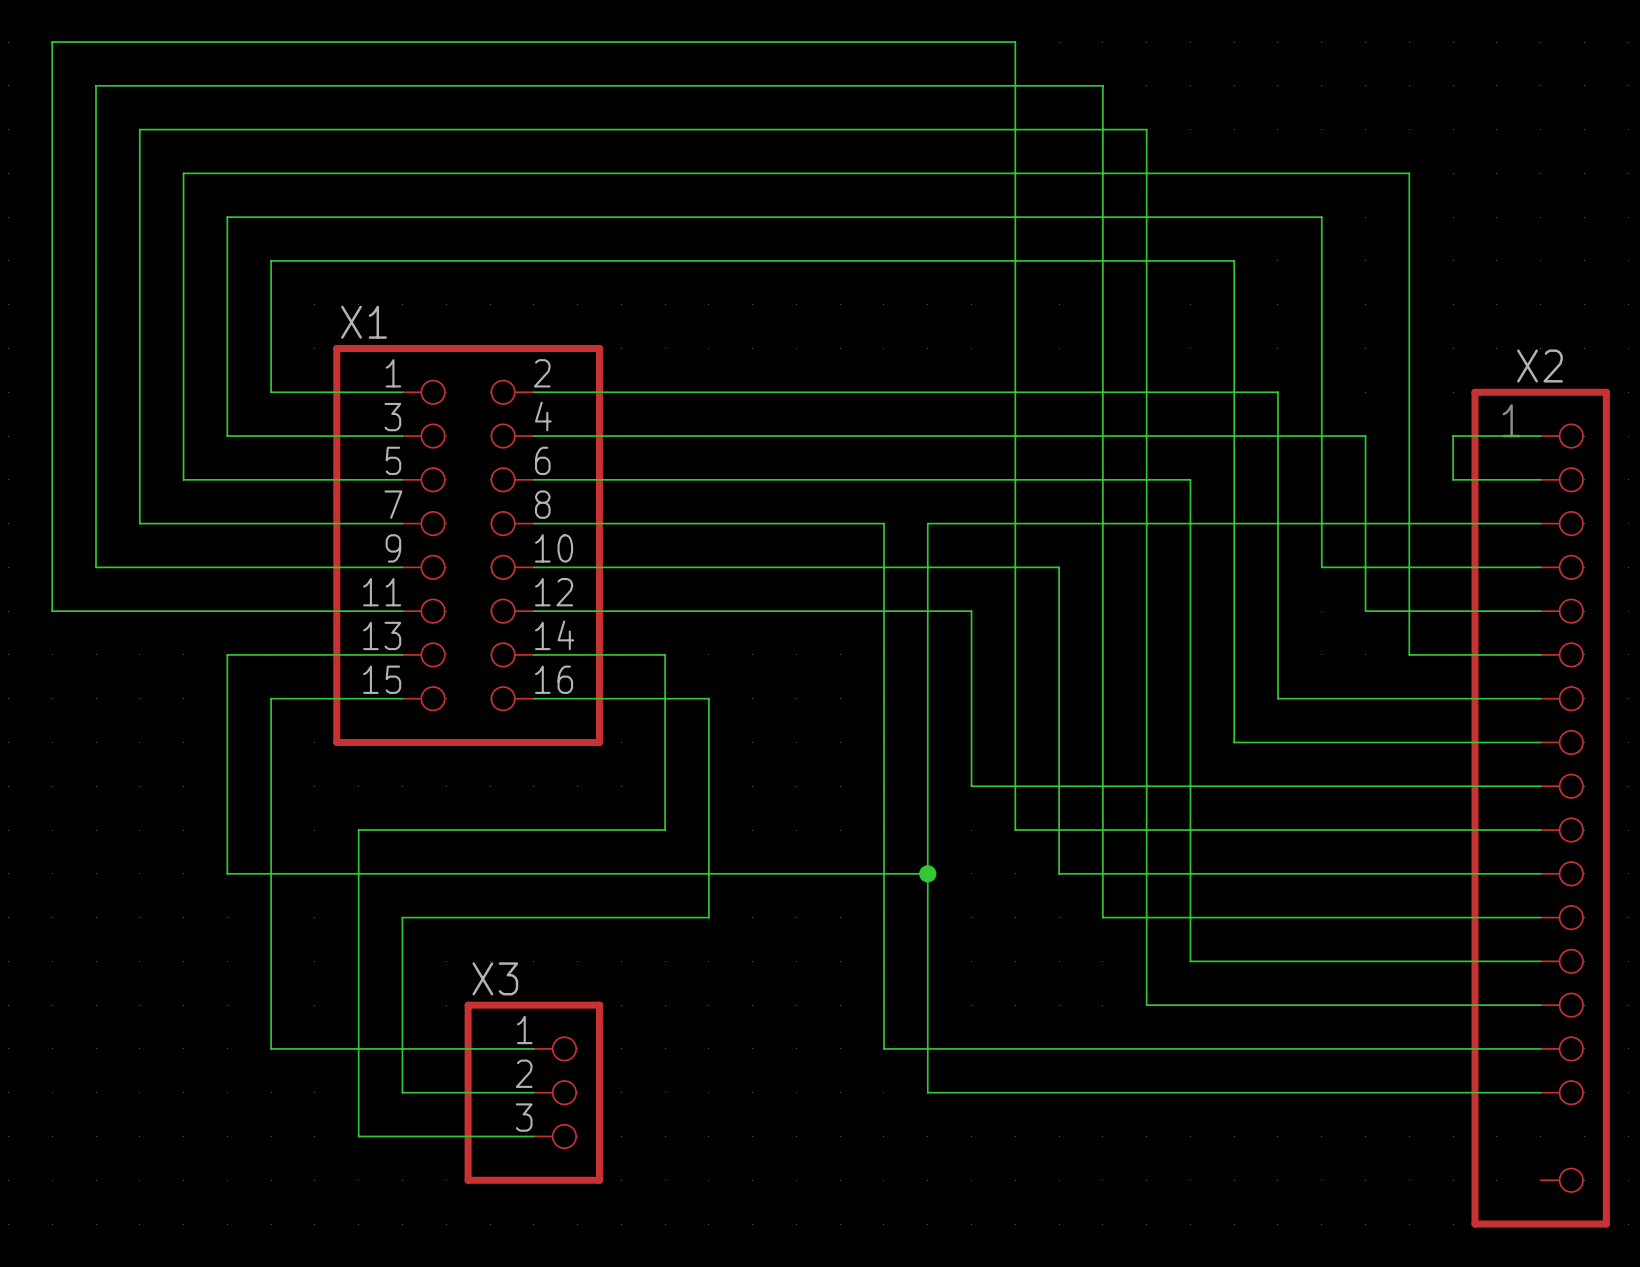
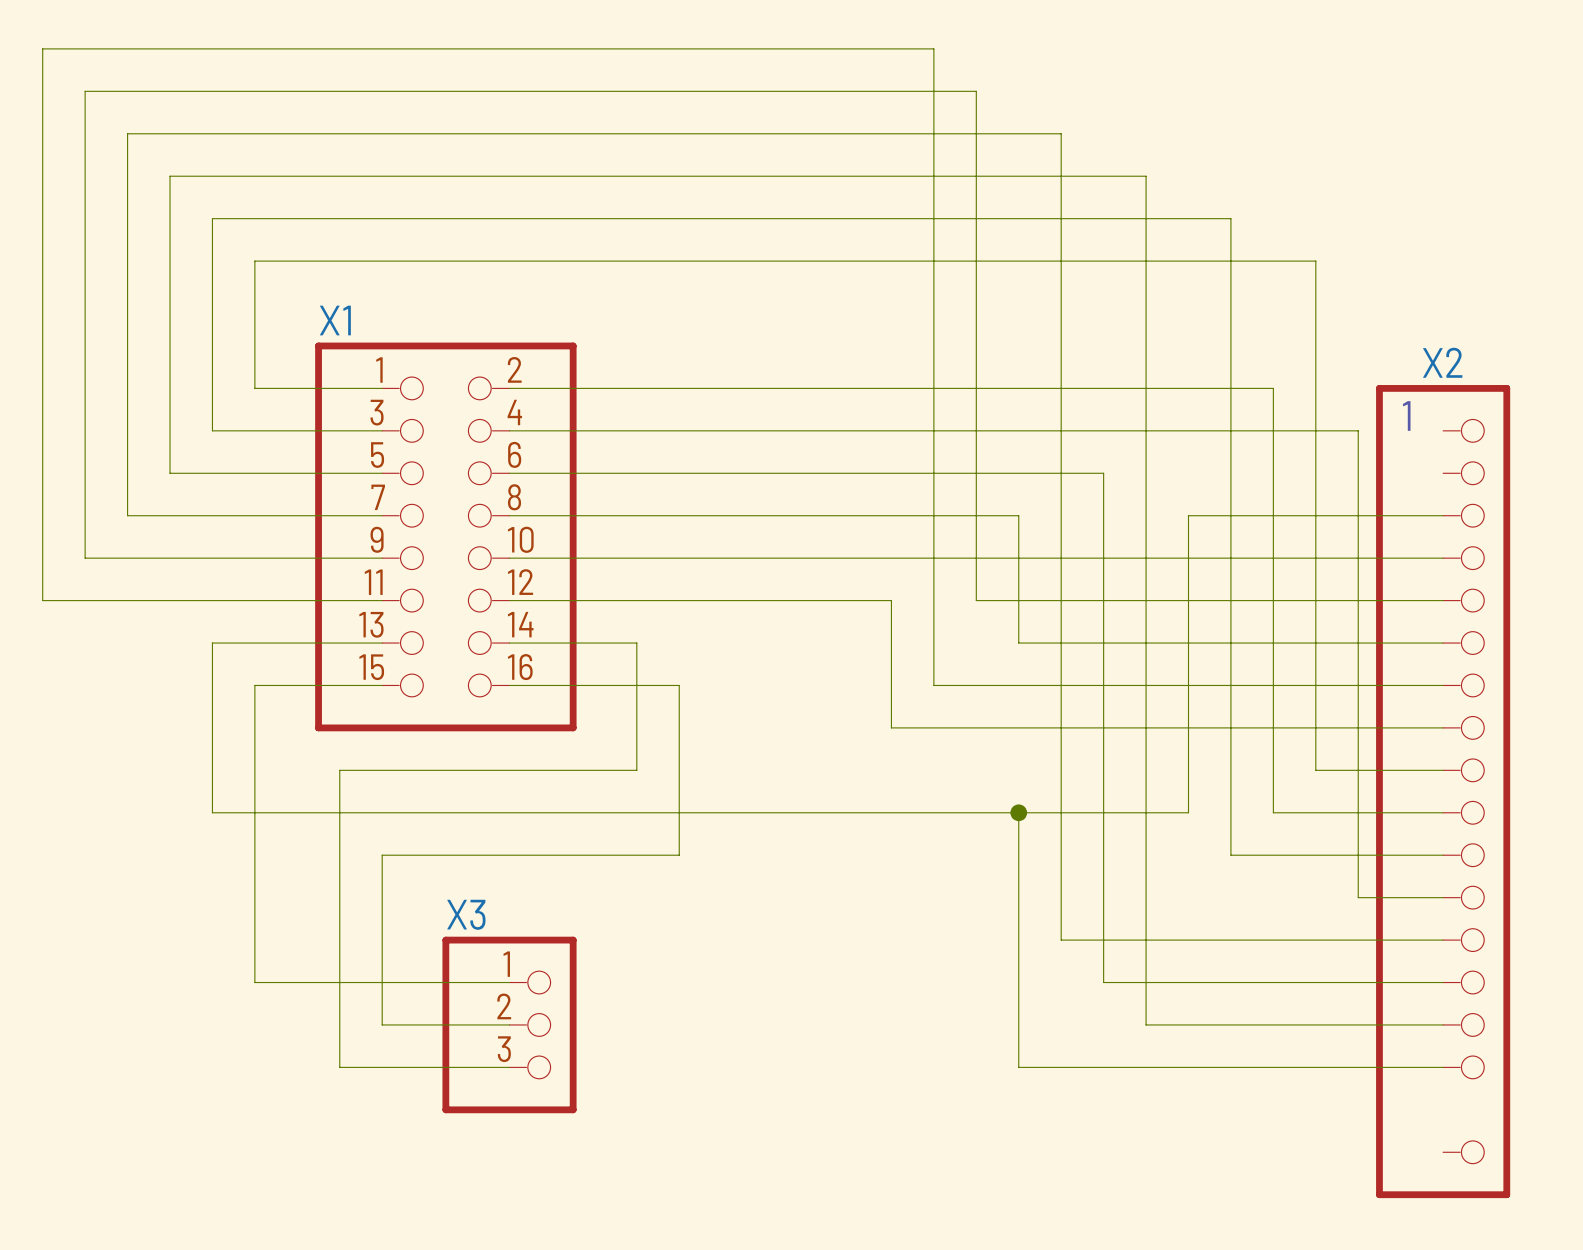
wire: (971, 42) (1015, 42) (1015, 85) (1102, 85) (1102, 129) (1146, 129) (1146, 479) (1190, 479) -> (1146, 176) (1146, 473)
wire: none -> (933, 48) (933, 600)
wire: (1190, 173) (1409, 173) (1409, 436) -> (1188, 261) (1315, 261) (1315, 430) (1358, 430)
wire: (1277, 217) (1321, 217) (1321, 392) -> (1230, 218) (1230, 388) (1273, 388)
wire: (1234, 260) (1234, 523) (1059, 523) -> none
wire: (1540, 436) (1453, 436) (1453, 479) (1540, 479) -> none
wire: (883, 523) (883, 1048) (1190, 1048) -> none
wire: (927, 523) (927, 611) (971, 611) -> (891, 515) (849, 515)
wire: (1496, 523) (1540, 523) -> none
wire: (1496, 567) (1540, 567) -> none
wire: (1015, 611) (1015, 830) -> none
wire: (1496, 611) (1540, 611) -> none
wire: (1059, 654) (1059, 830) -> (1018, 643) (1358, 643) (1358, 897)
wire: (1496, 654) (1540, 654) -> none
wire: (971, 698) (971, 786) (1365, 786) -> (976, 600) (1315, 600) (1315, 770)
wire: (1496, 698) (1540, 698) -> none
wire: (927, 742) (927, 1092) (1059, 1092) -> (1018, 855) (1018, 1067)
wire: none -> (891, 727) (1188, 727) (1188, 812)
wire: (1496, 742) (1540, 742) -> none
wire: (665, 786) (665, 830) -> (976, 812) (636, 812)
wire: none -> (636, 770) (339, 770) (339, 812) (212, 812)
wire: (1496, 786) (1540, 786) -> none
X2 position: (1540, 808) -> (1443, 791)
wire: (227, 830) (227, 873) (402, 873) -> (382, 897) (382, 855)
junction: none -> (1018, 812)
wire: (1234, 830) (1321, 830) -> (1018, 515) (1018, 558) (1273, 558) (1273, 812)
wire: (1496, 830) (1540, 830) -> none
wire: (927, 873) (708, 873) (708, 917) (402, 917) -> none
junction: (927, 873) -> none
wire: (1059, 873) (1277, 873) -> (933, 685) (1230, 685) (1230, 855)
wire: (1496, 873) (1540, 873) -> none
wire: (1102, 917) (1409, 917) -> (1061, 897) (1061, 940) (1146, 940) (1146, 1024)
wire: (1496, 917) (1540, 917) -> none
wire: (1496, 961) (1540, 961) -> none
wire: (271, 1005) (271, 1048) (402, 1048) (402, 1092) -> (339, 1067) (382, 1067)
wire: none -> (254, 982) (509, 982)
wire: (1496, 1005) (1540, 1005) -> none
wire: (1496, 1048) (1540, 1048) -> none
wire: (358, 1092) (358, 1136) (533, 1136) -> none
X3 position: (533, 1092) -> (509, 1024)
wire: (1496, 1092) (1540, 1092) -> none

